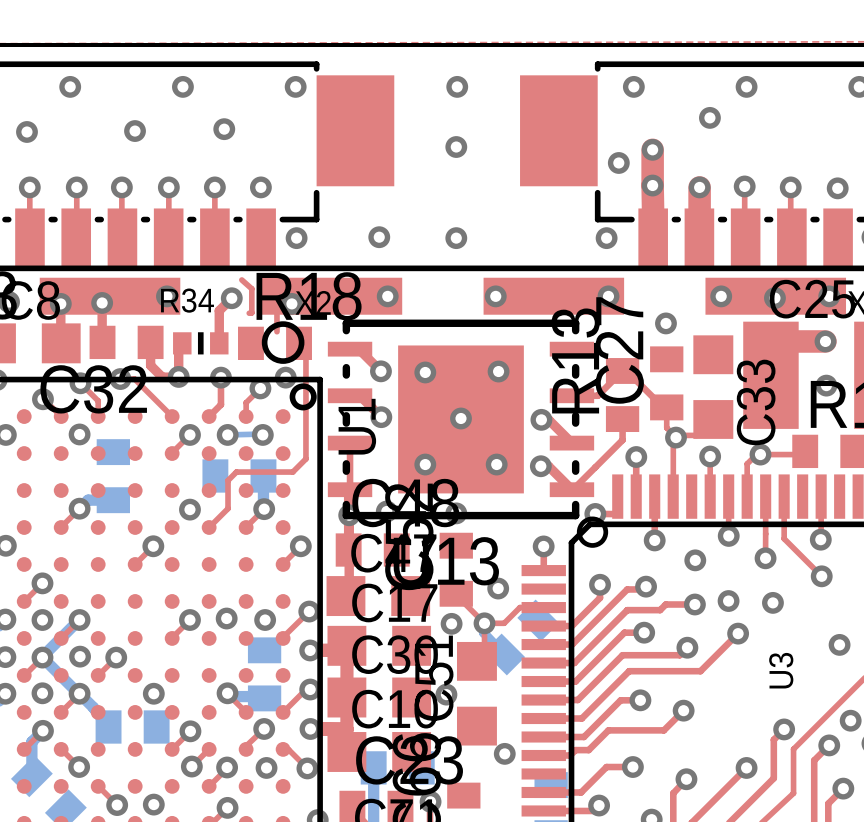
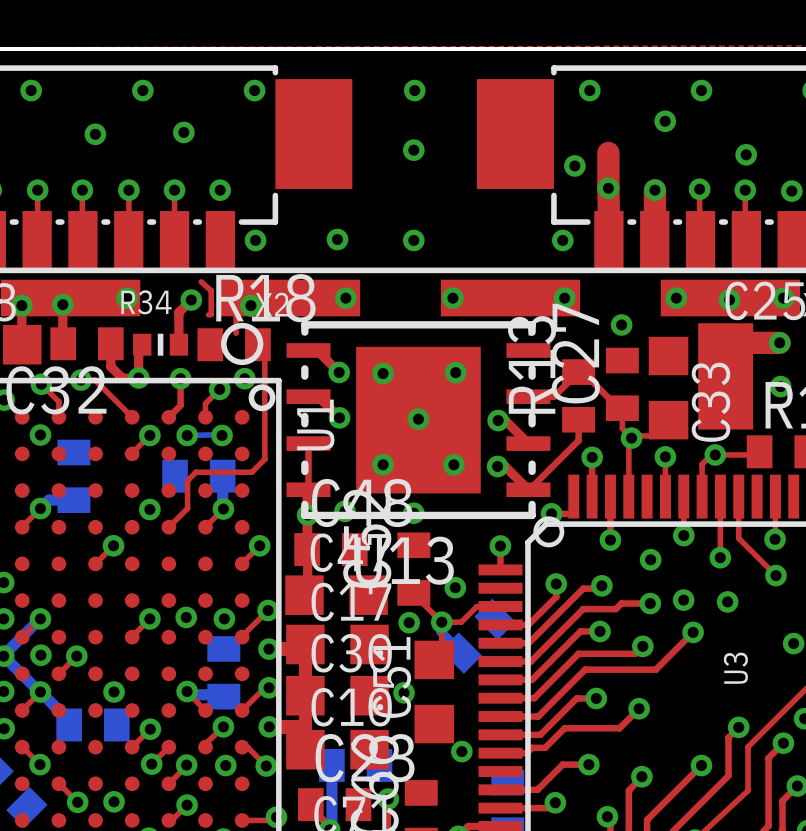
via position: (652, 149) -> (746, 154)

